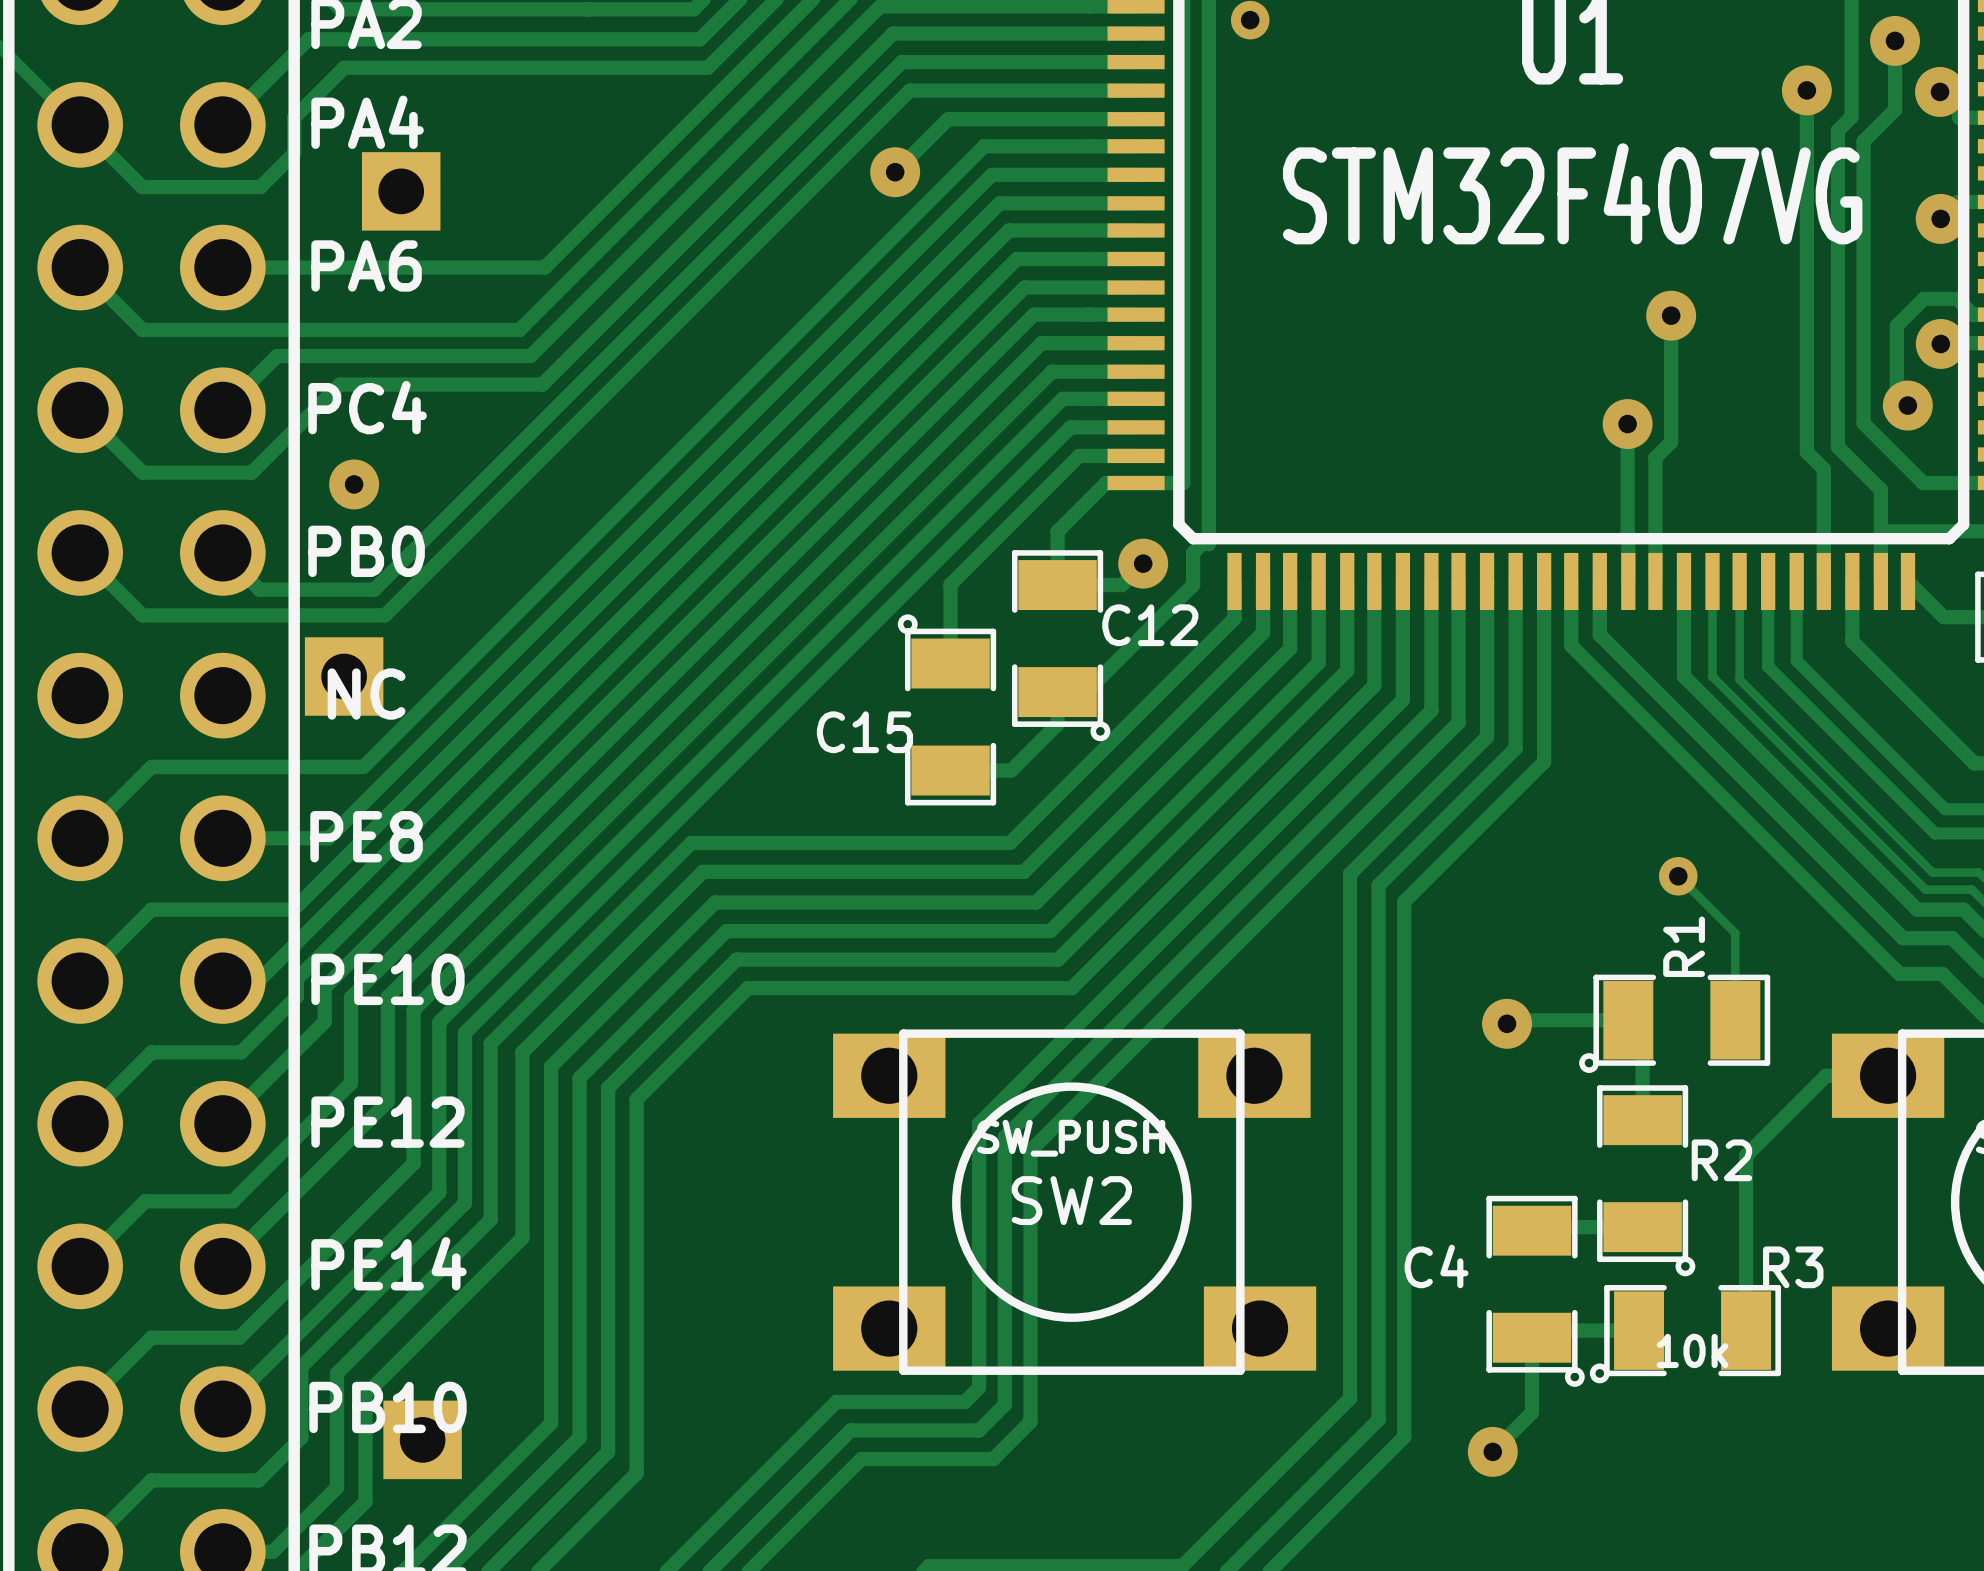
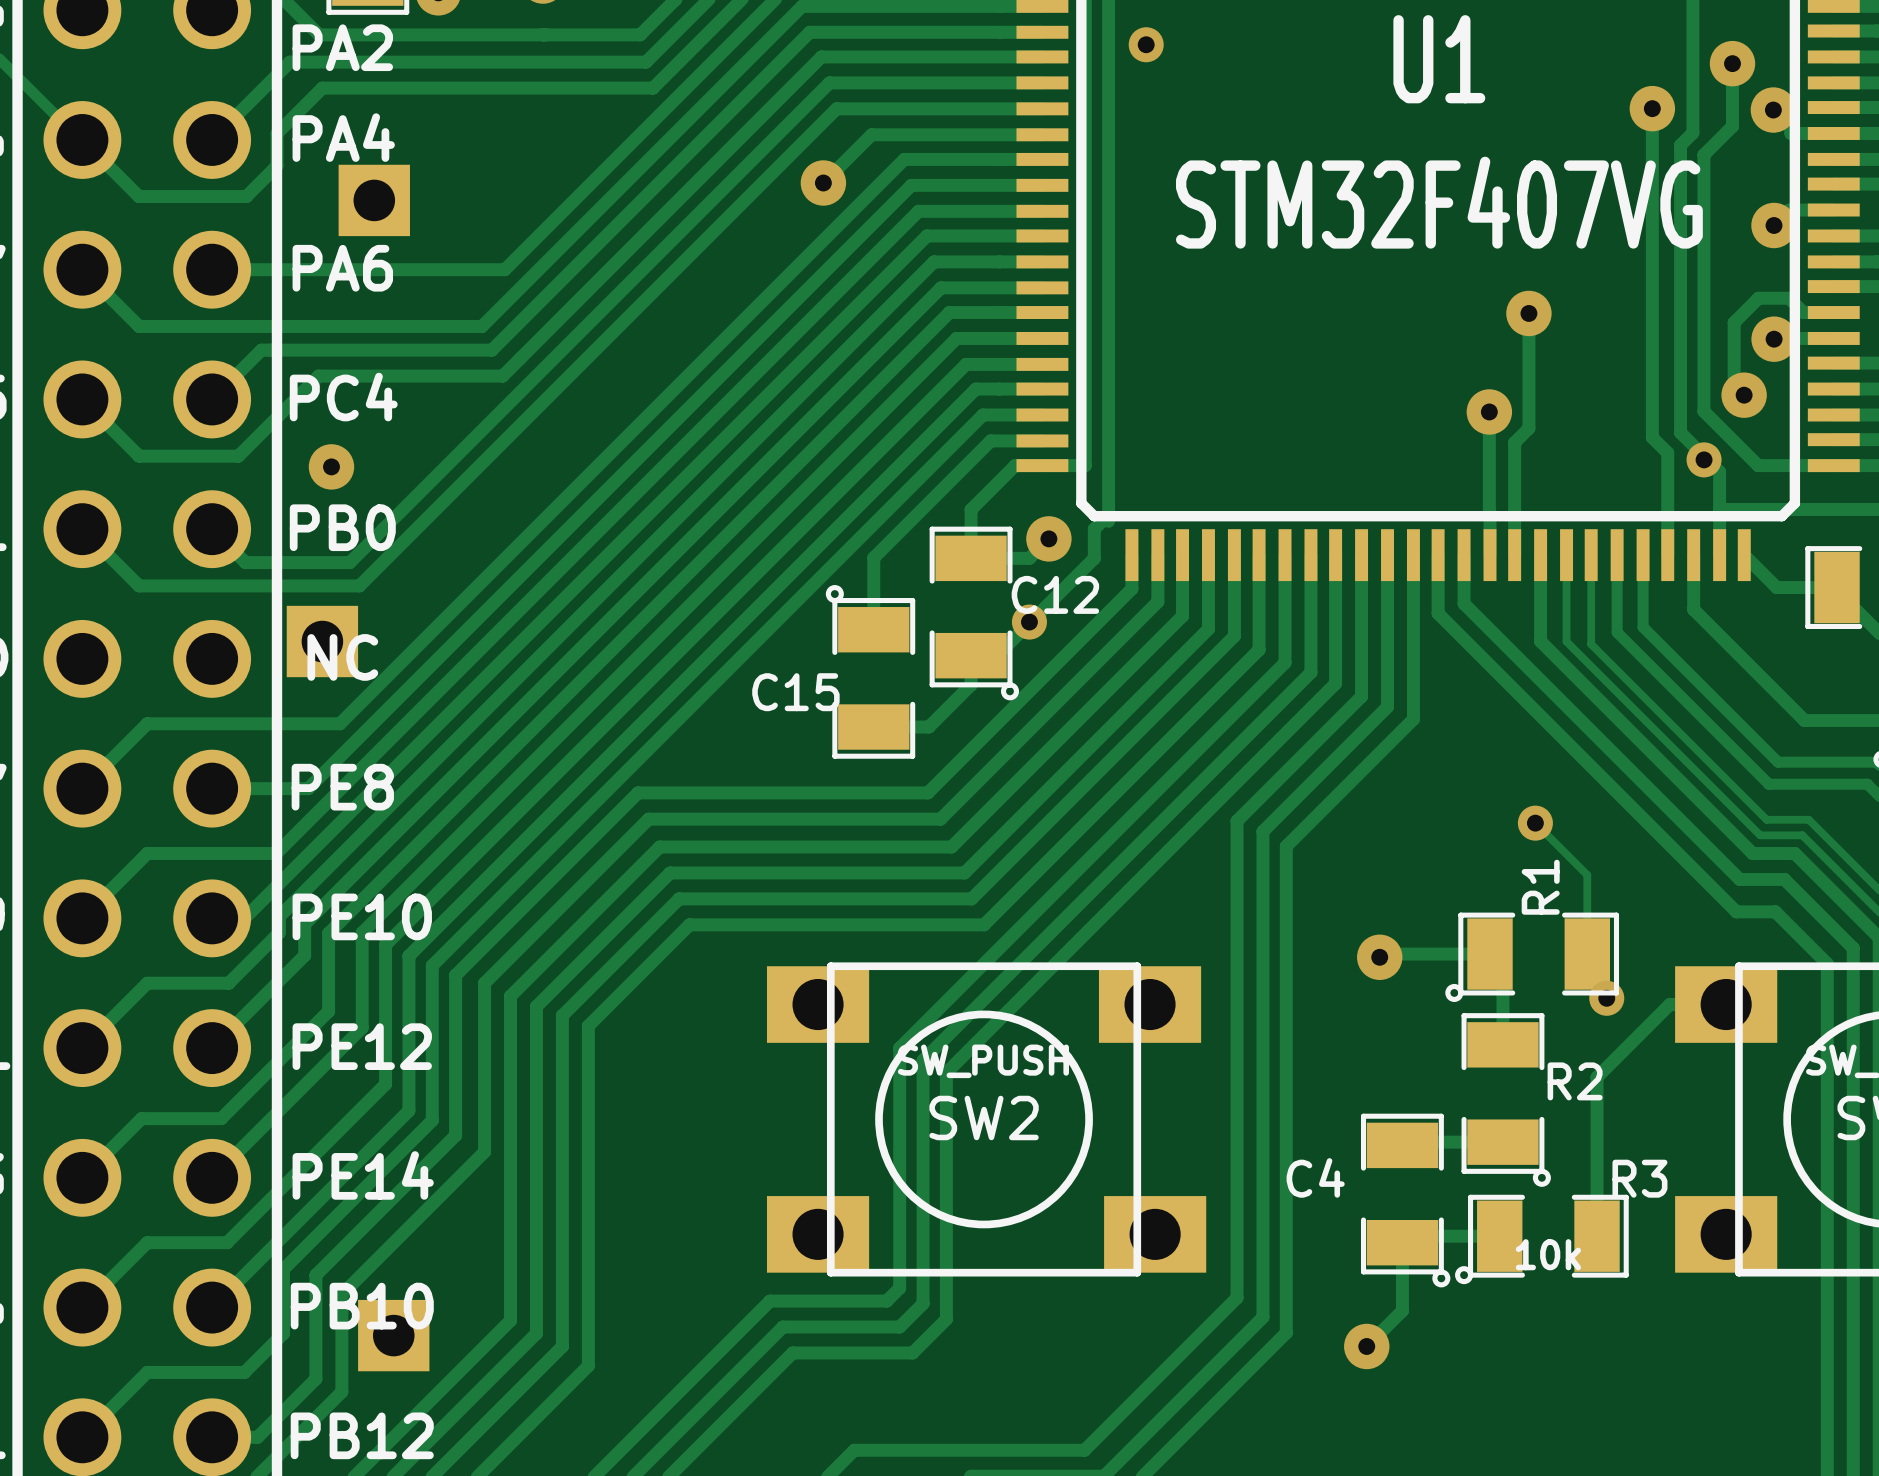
via: none -> (1704, 459)
via: none -> (1029, 622)
via: none -> (1606, 998)

